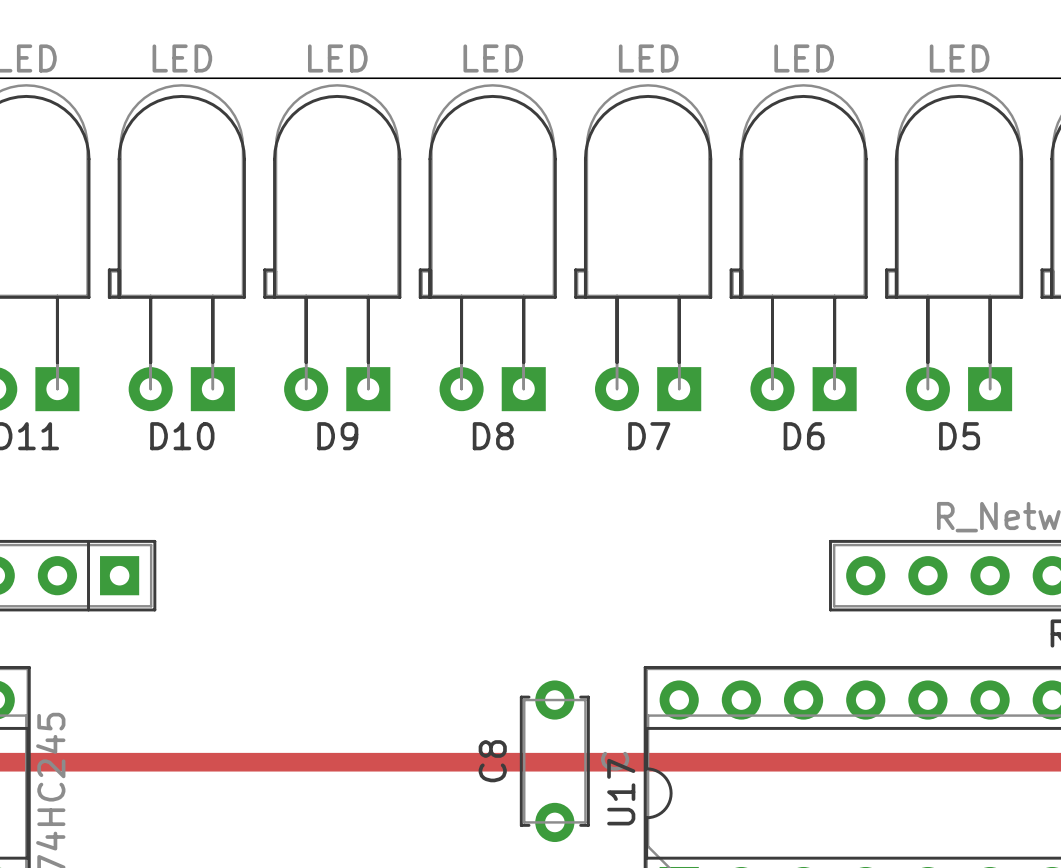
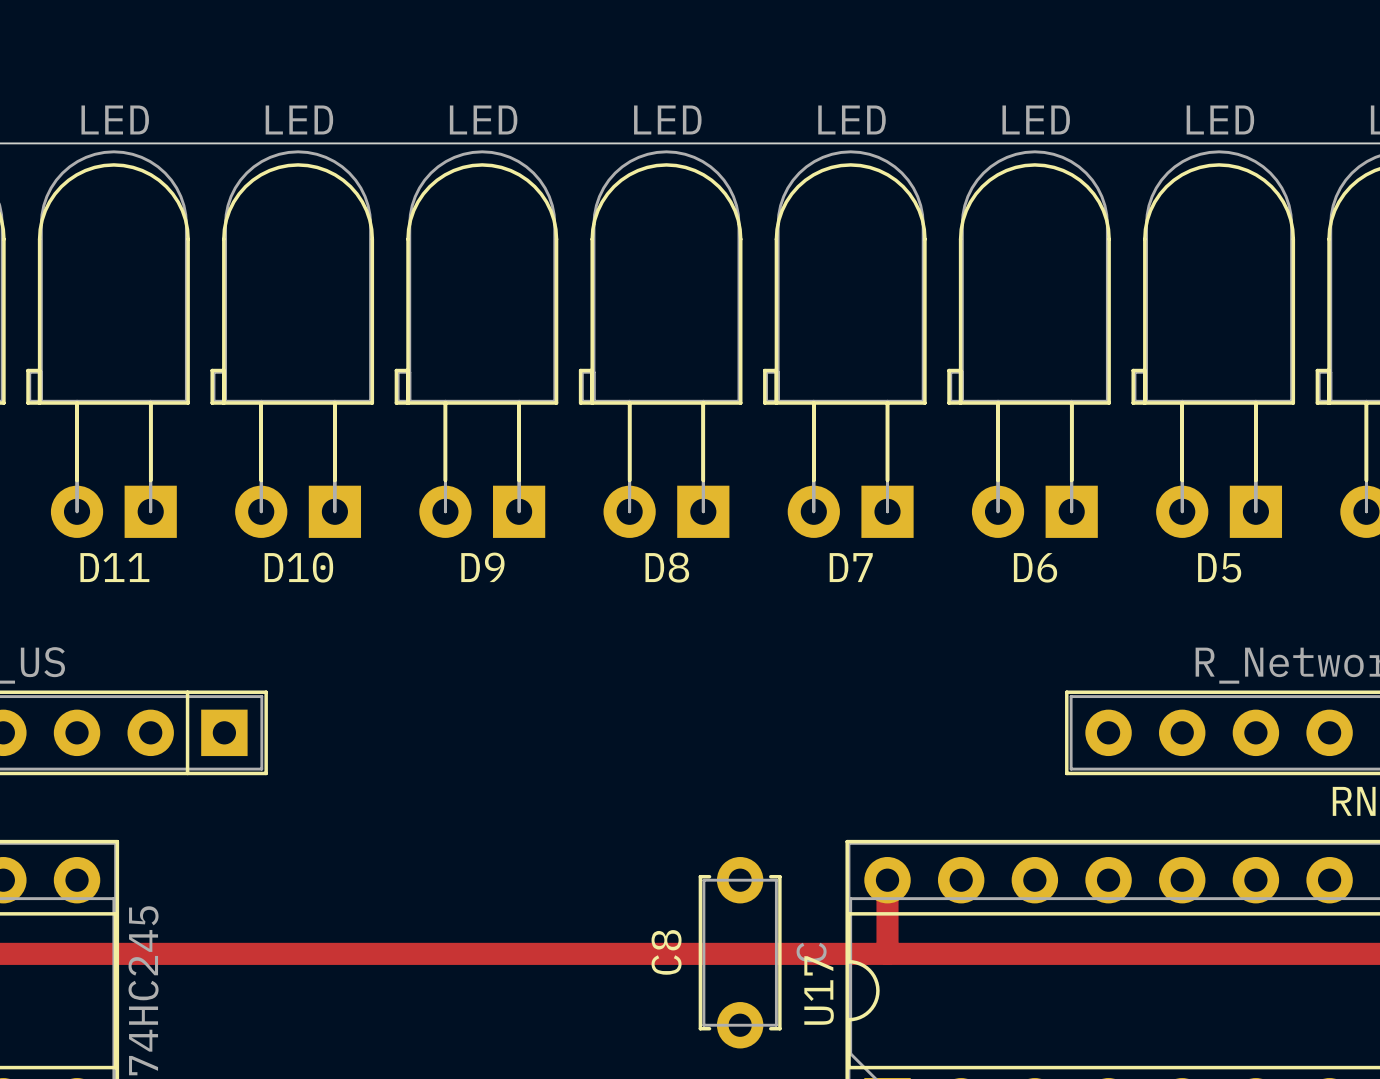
track: none -> (887, 880) (887, 953)

